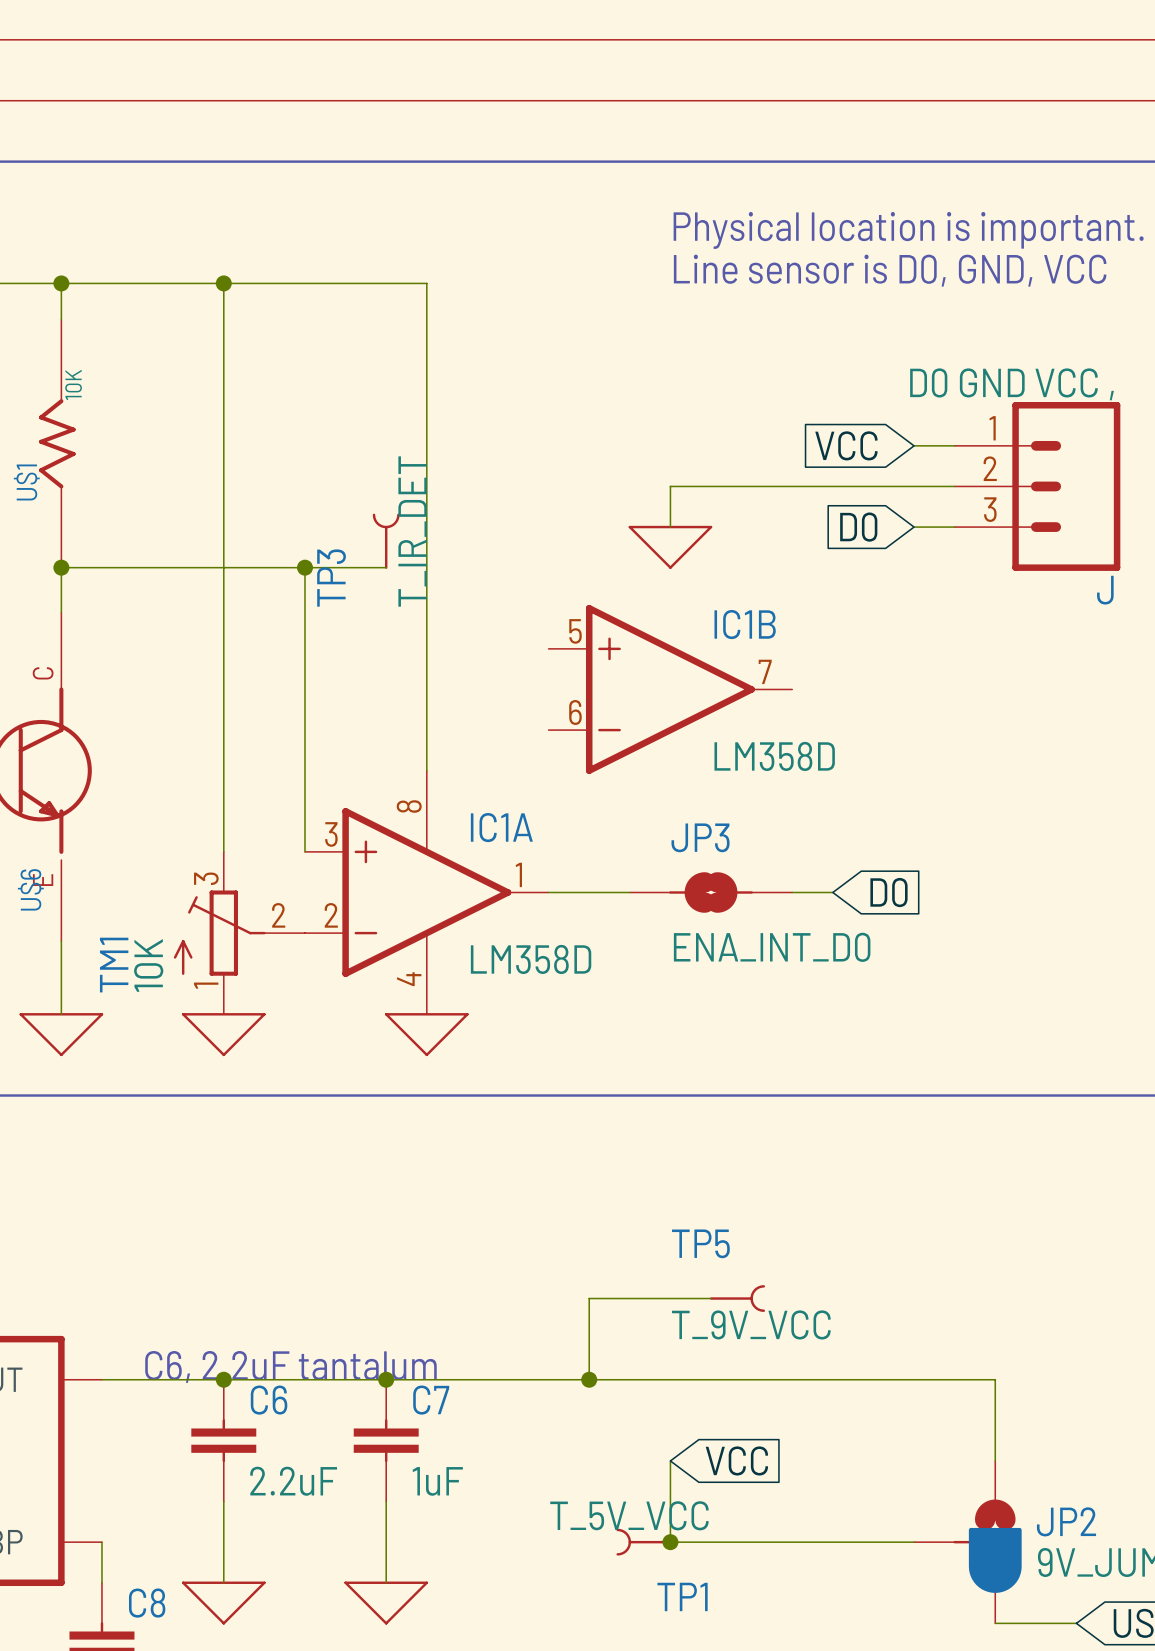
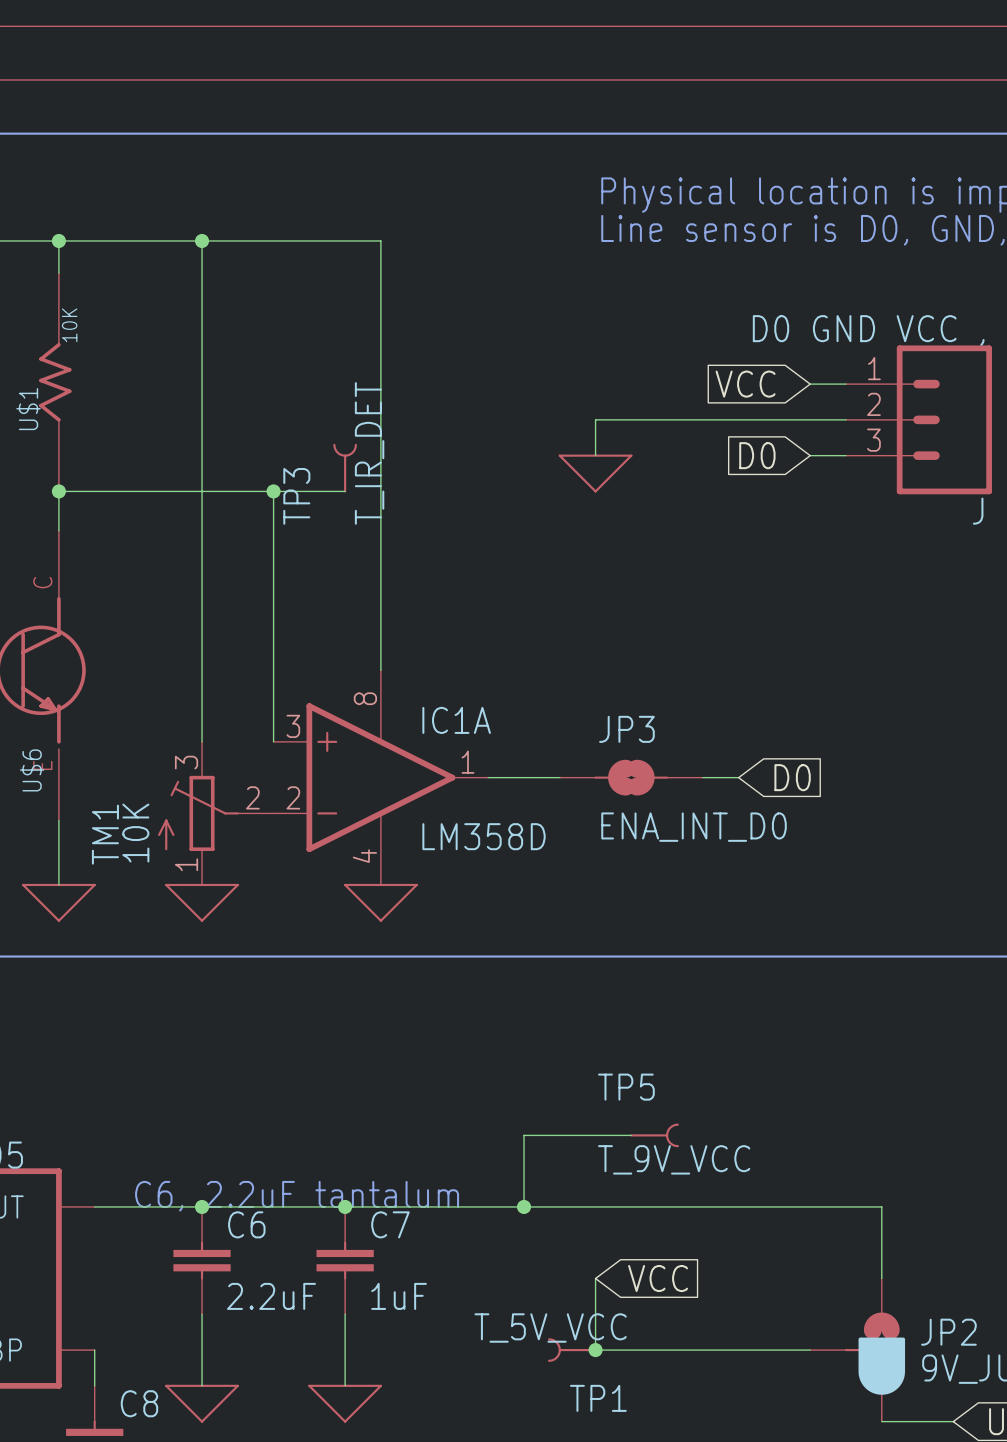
IC1B: LM358D (670, 689) -> none

